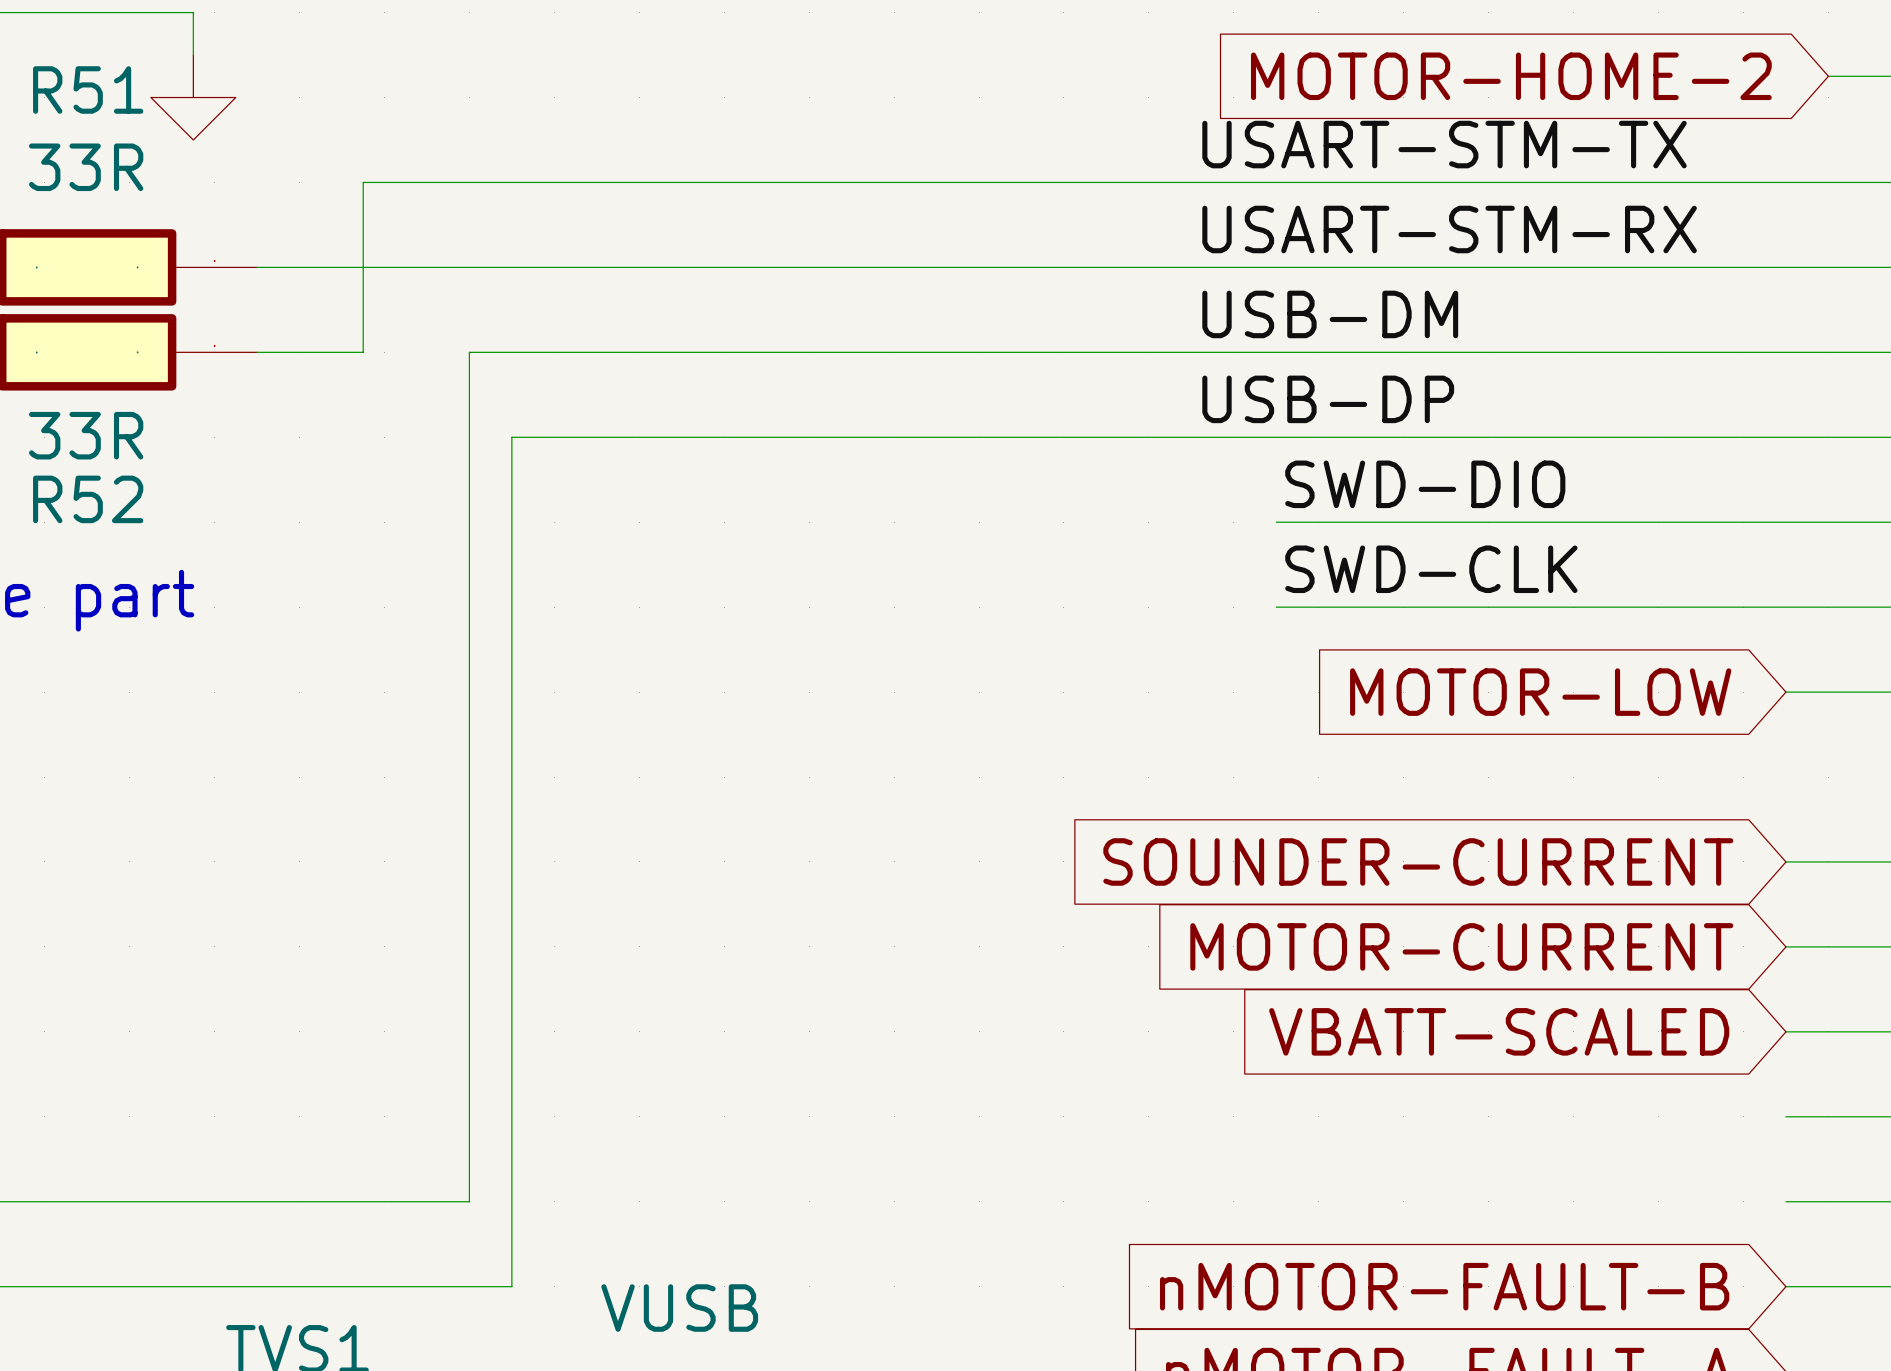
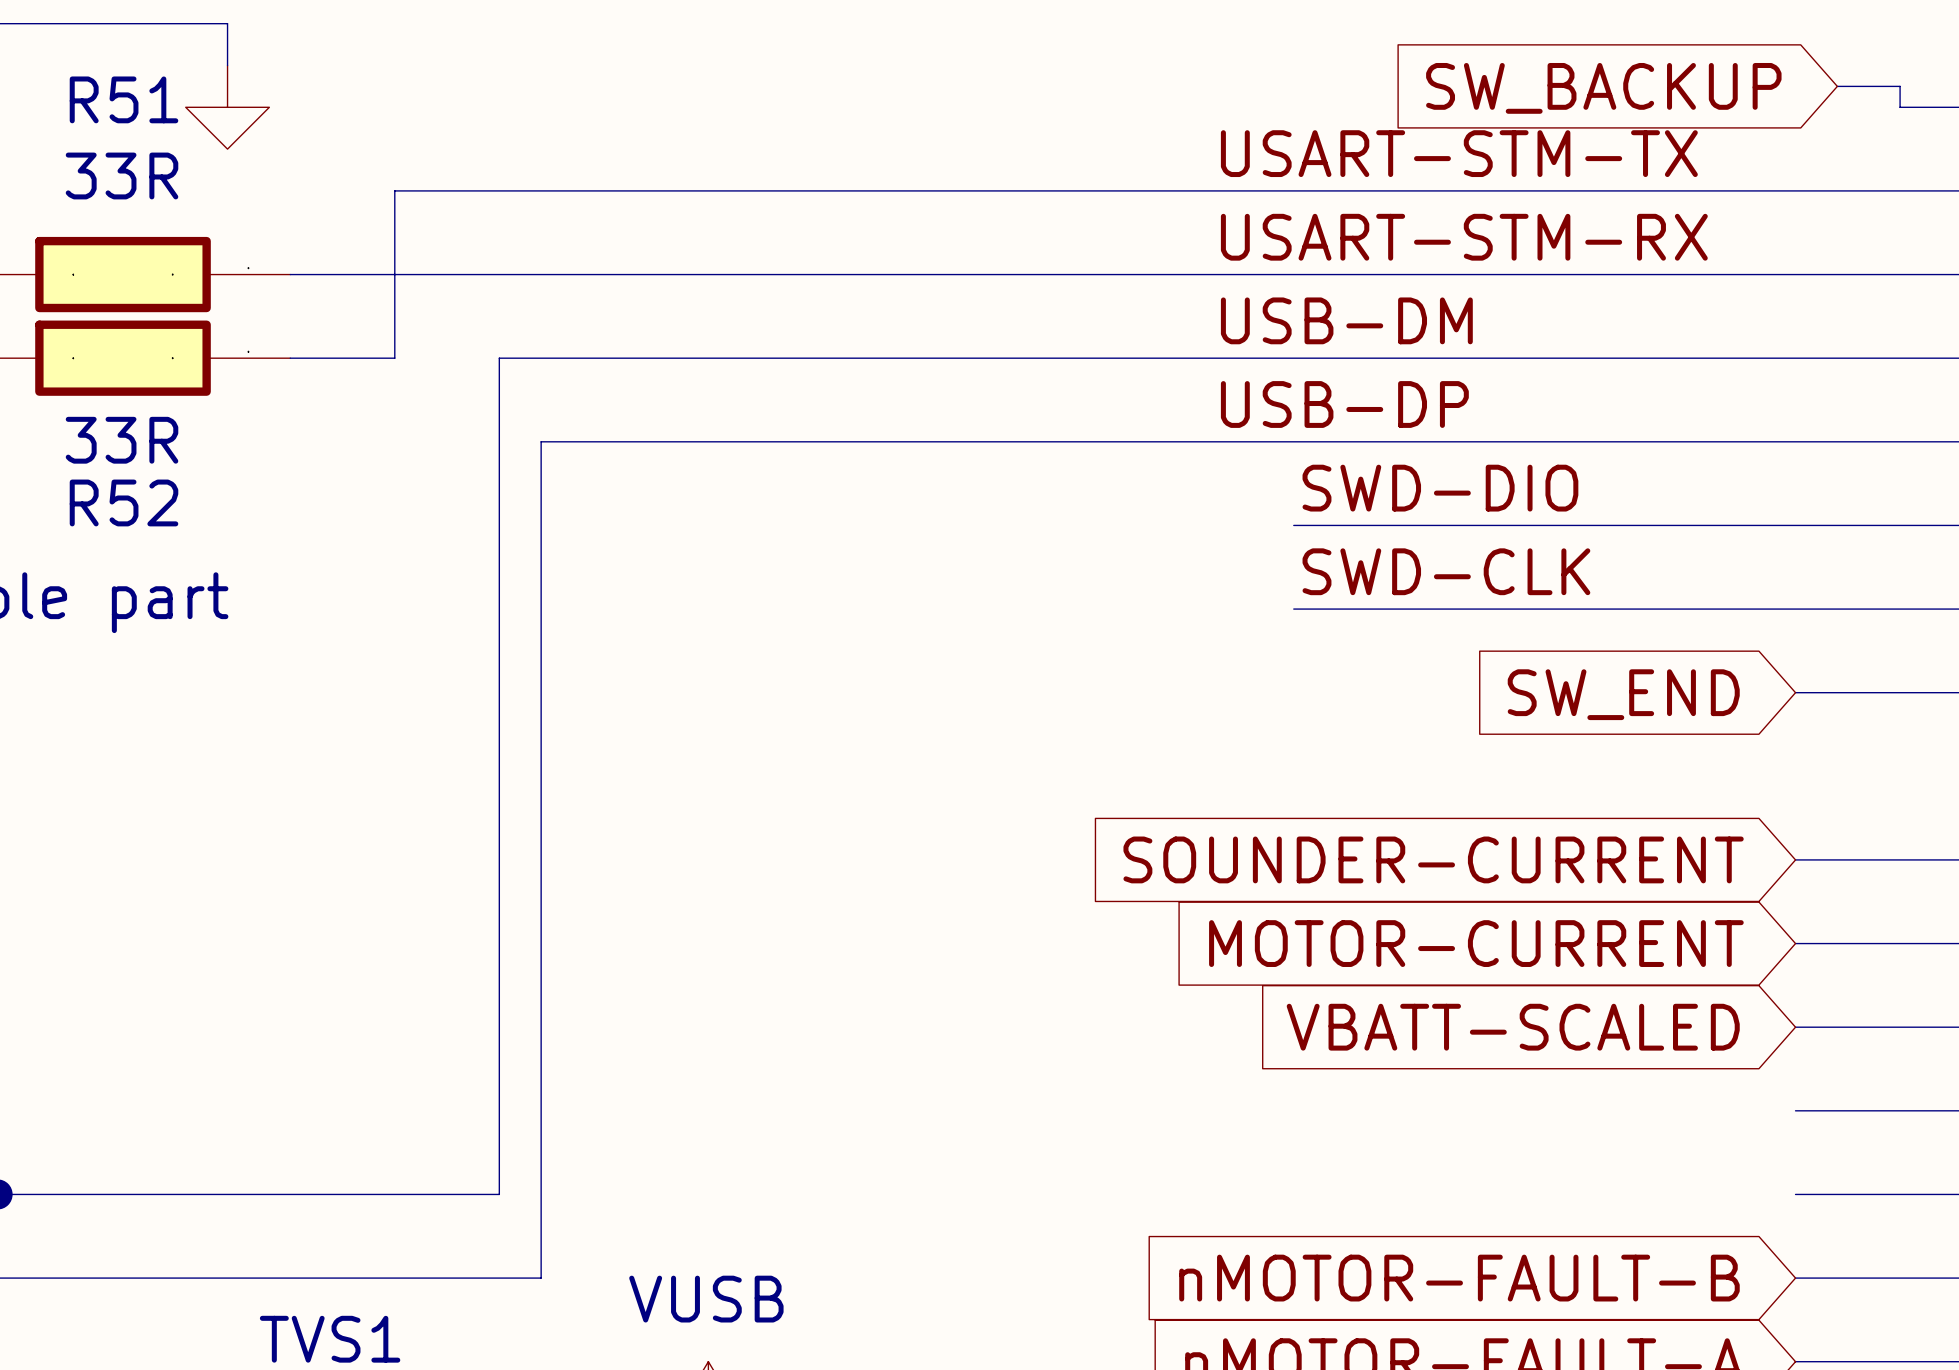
global label: MOTOR-HOME-2 (1511, 76) -> SW_BACKUP (1603, 88)
global label: MOTOR-LOW (1540, 692) -> SW_END (1623, 694)

